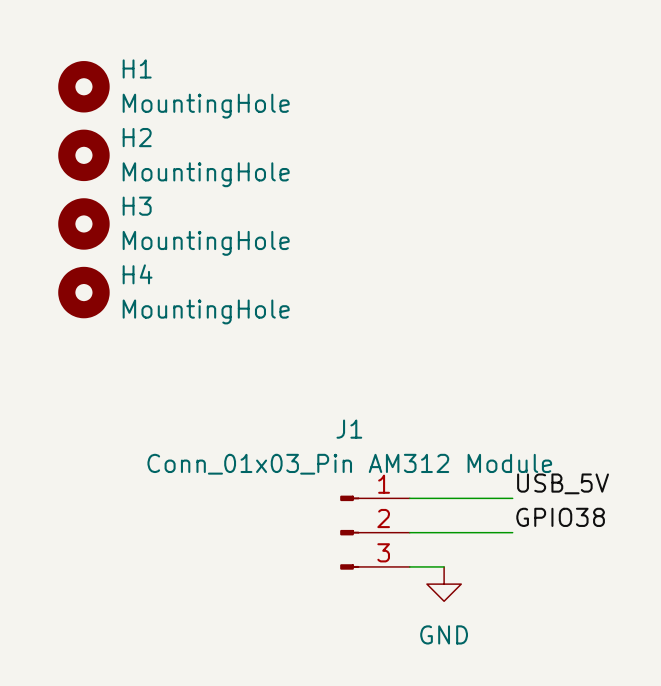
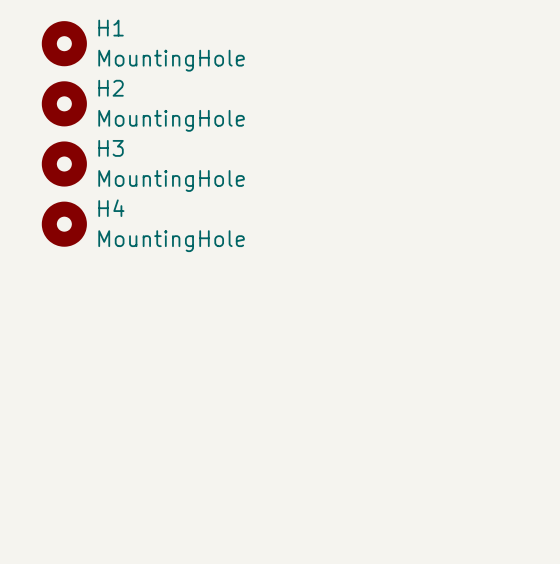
label: USB_5V (563, 483) -> none
wire: (409, 498) (512, 498) -> none
label: GPIO38 (560, 517) -> none
J1: Conn_01x03_Pin AM312 Module (374, 532) -> none
wire: (409, 532) (512, 532) -> none
wire: (409, 566) (444, 566) -> none
power symbol: GND (444, 584) -> none

